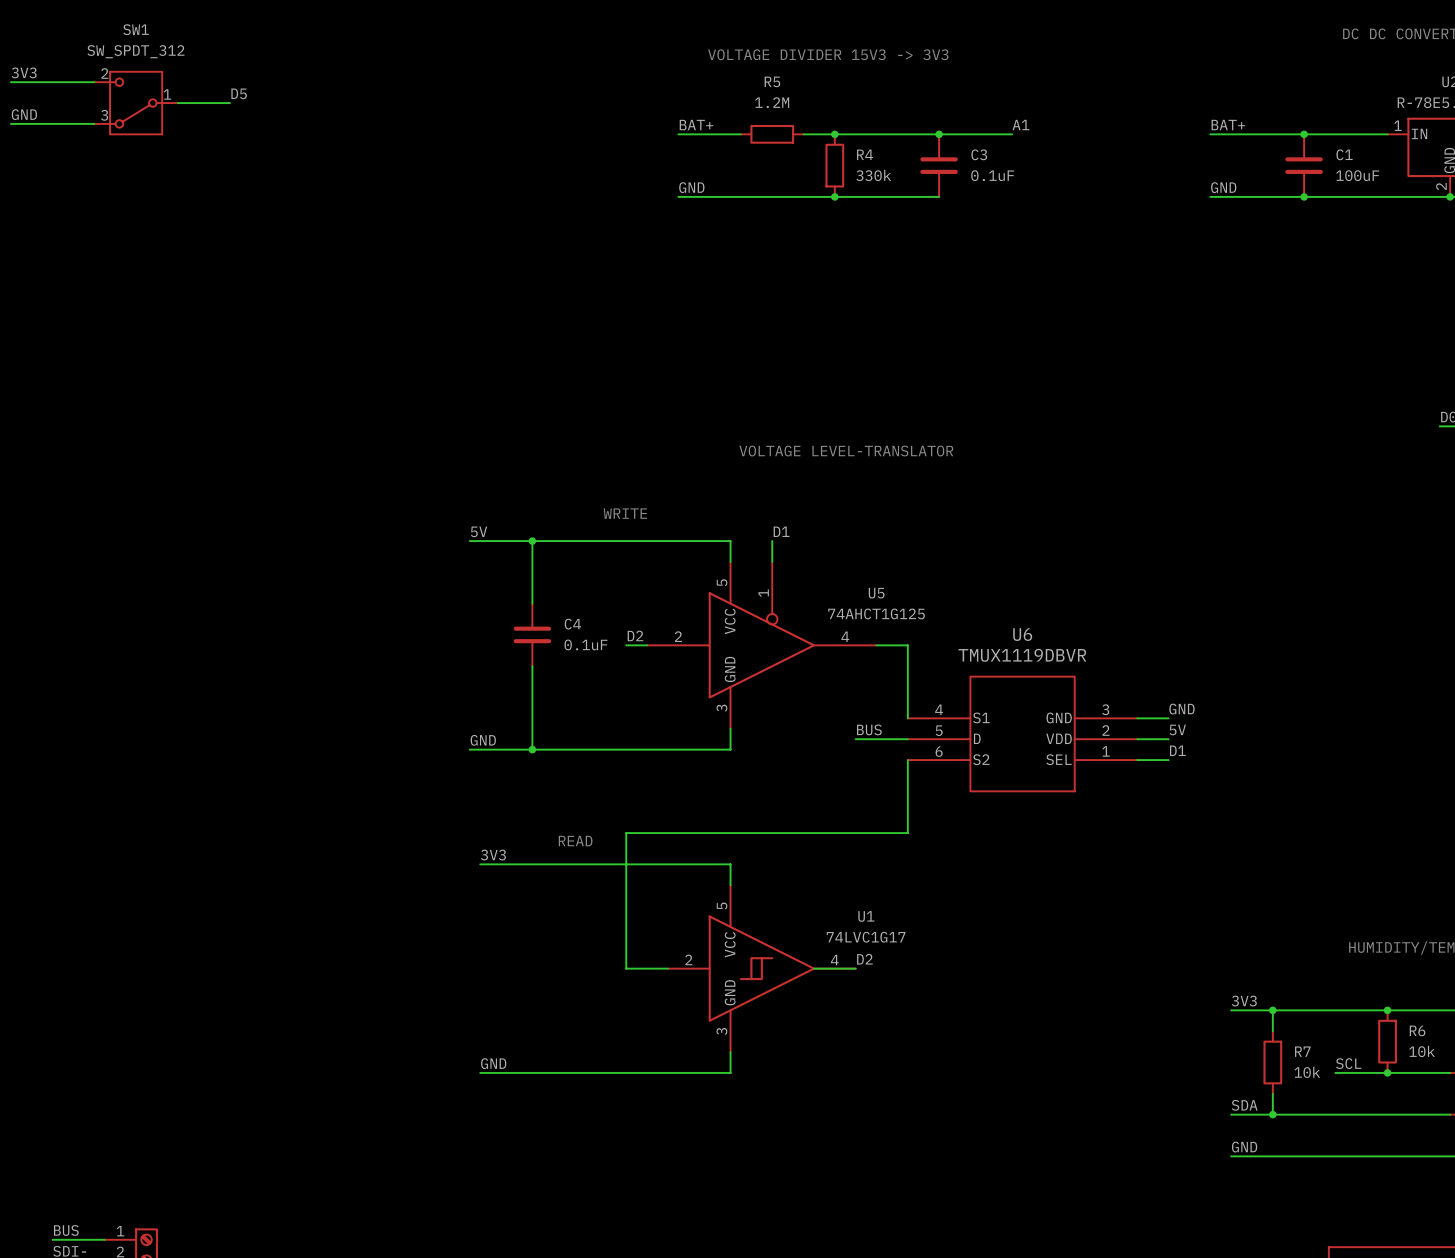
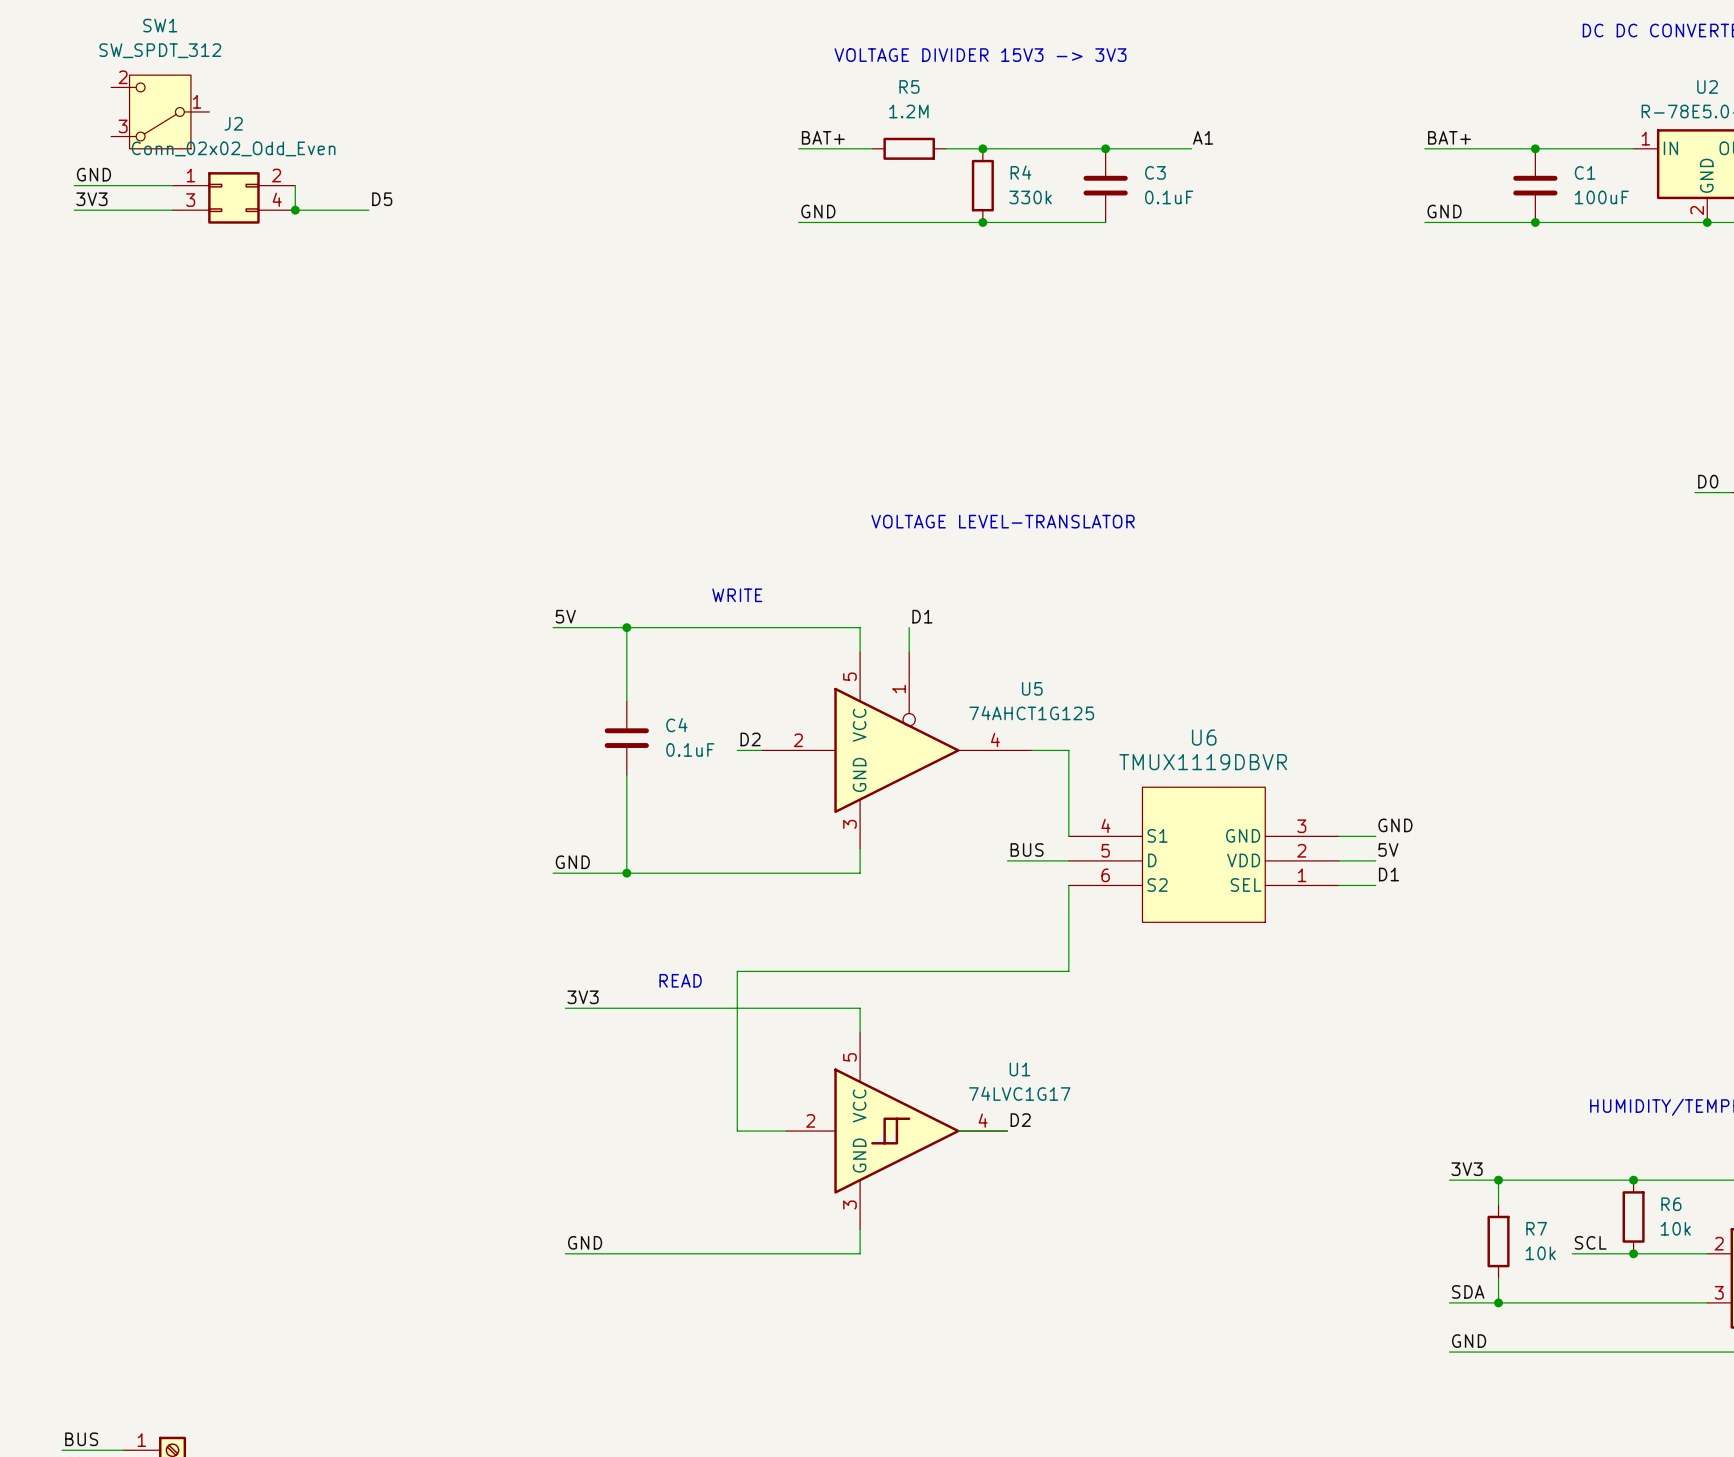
label position: 3V3 (24, 72) -> 3V3 (91, 199)
wire: (10, 82) (94, 82) -> (74, 210) (172, 210)
label position: D5 (239, 93) -> D5 (382, 199)
wire: (177, 103) (229, 103) -> none
label position: GND (24, 114) -> GND (93, 174)
wire: (10, 123) (94, 123) -> (74, 185) (172, 185)
wire: none -> (295, 185) (295, 210) (368, 210)
J2: none -> Conn_02x02_Odd_Even (233, 197)
junction: none -> (295, 210)

